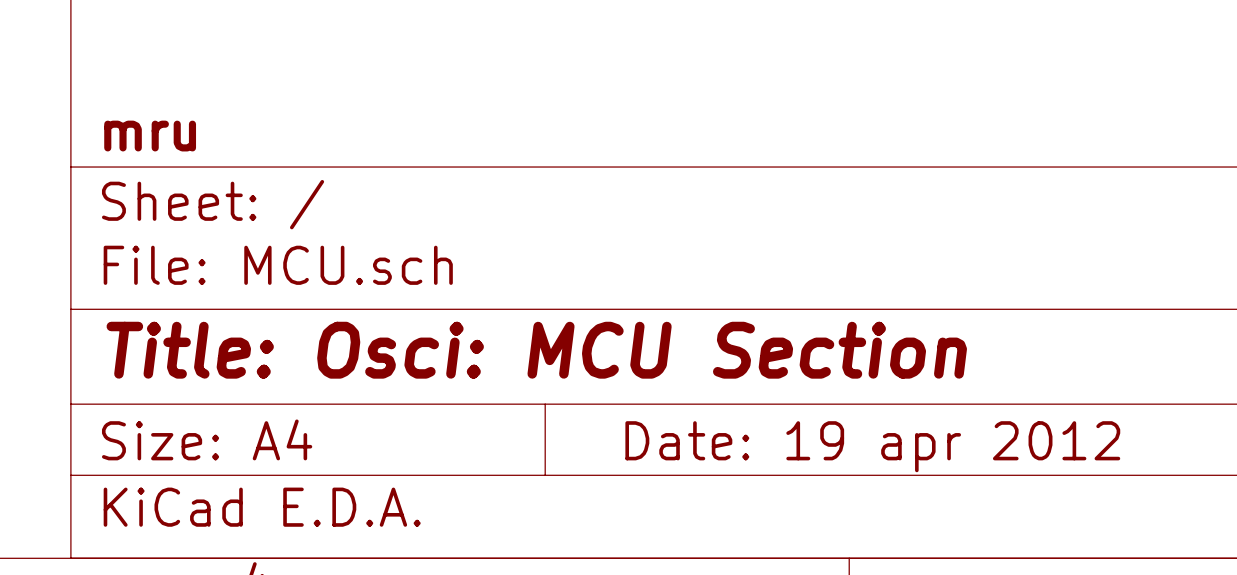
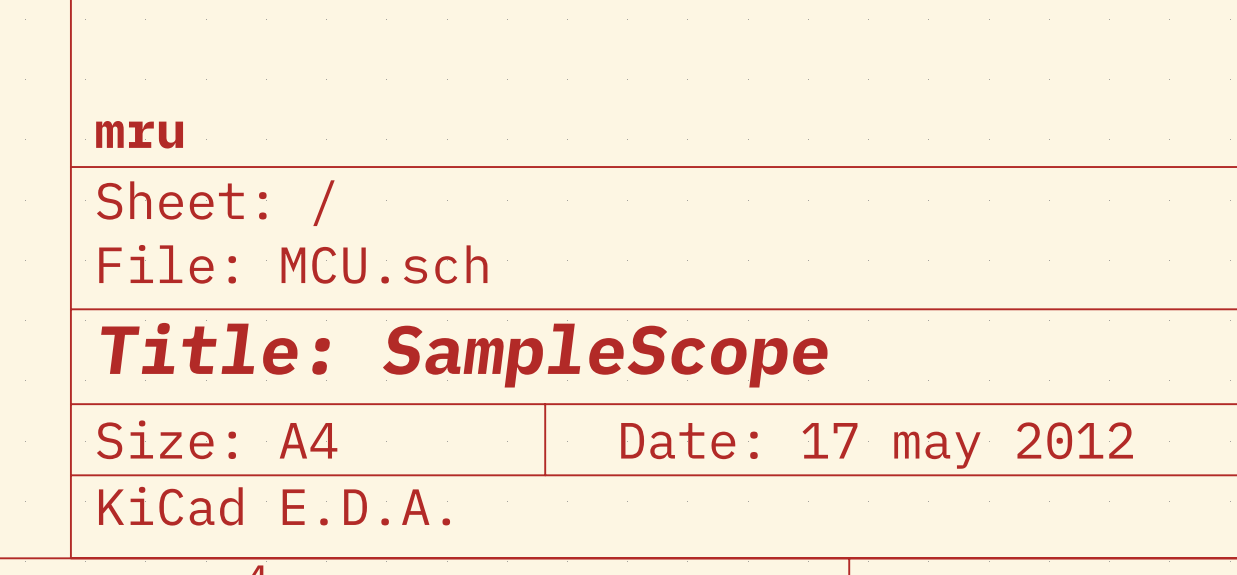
title block: Title: Osci: MCU Section (536, 350) -> Title: SampleScope (464, 355)
title block: Date: 19 apr 2012 (872, 446) -> Date: 17 may 2012 (877, 445)

